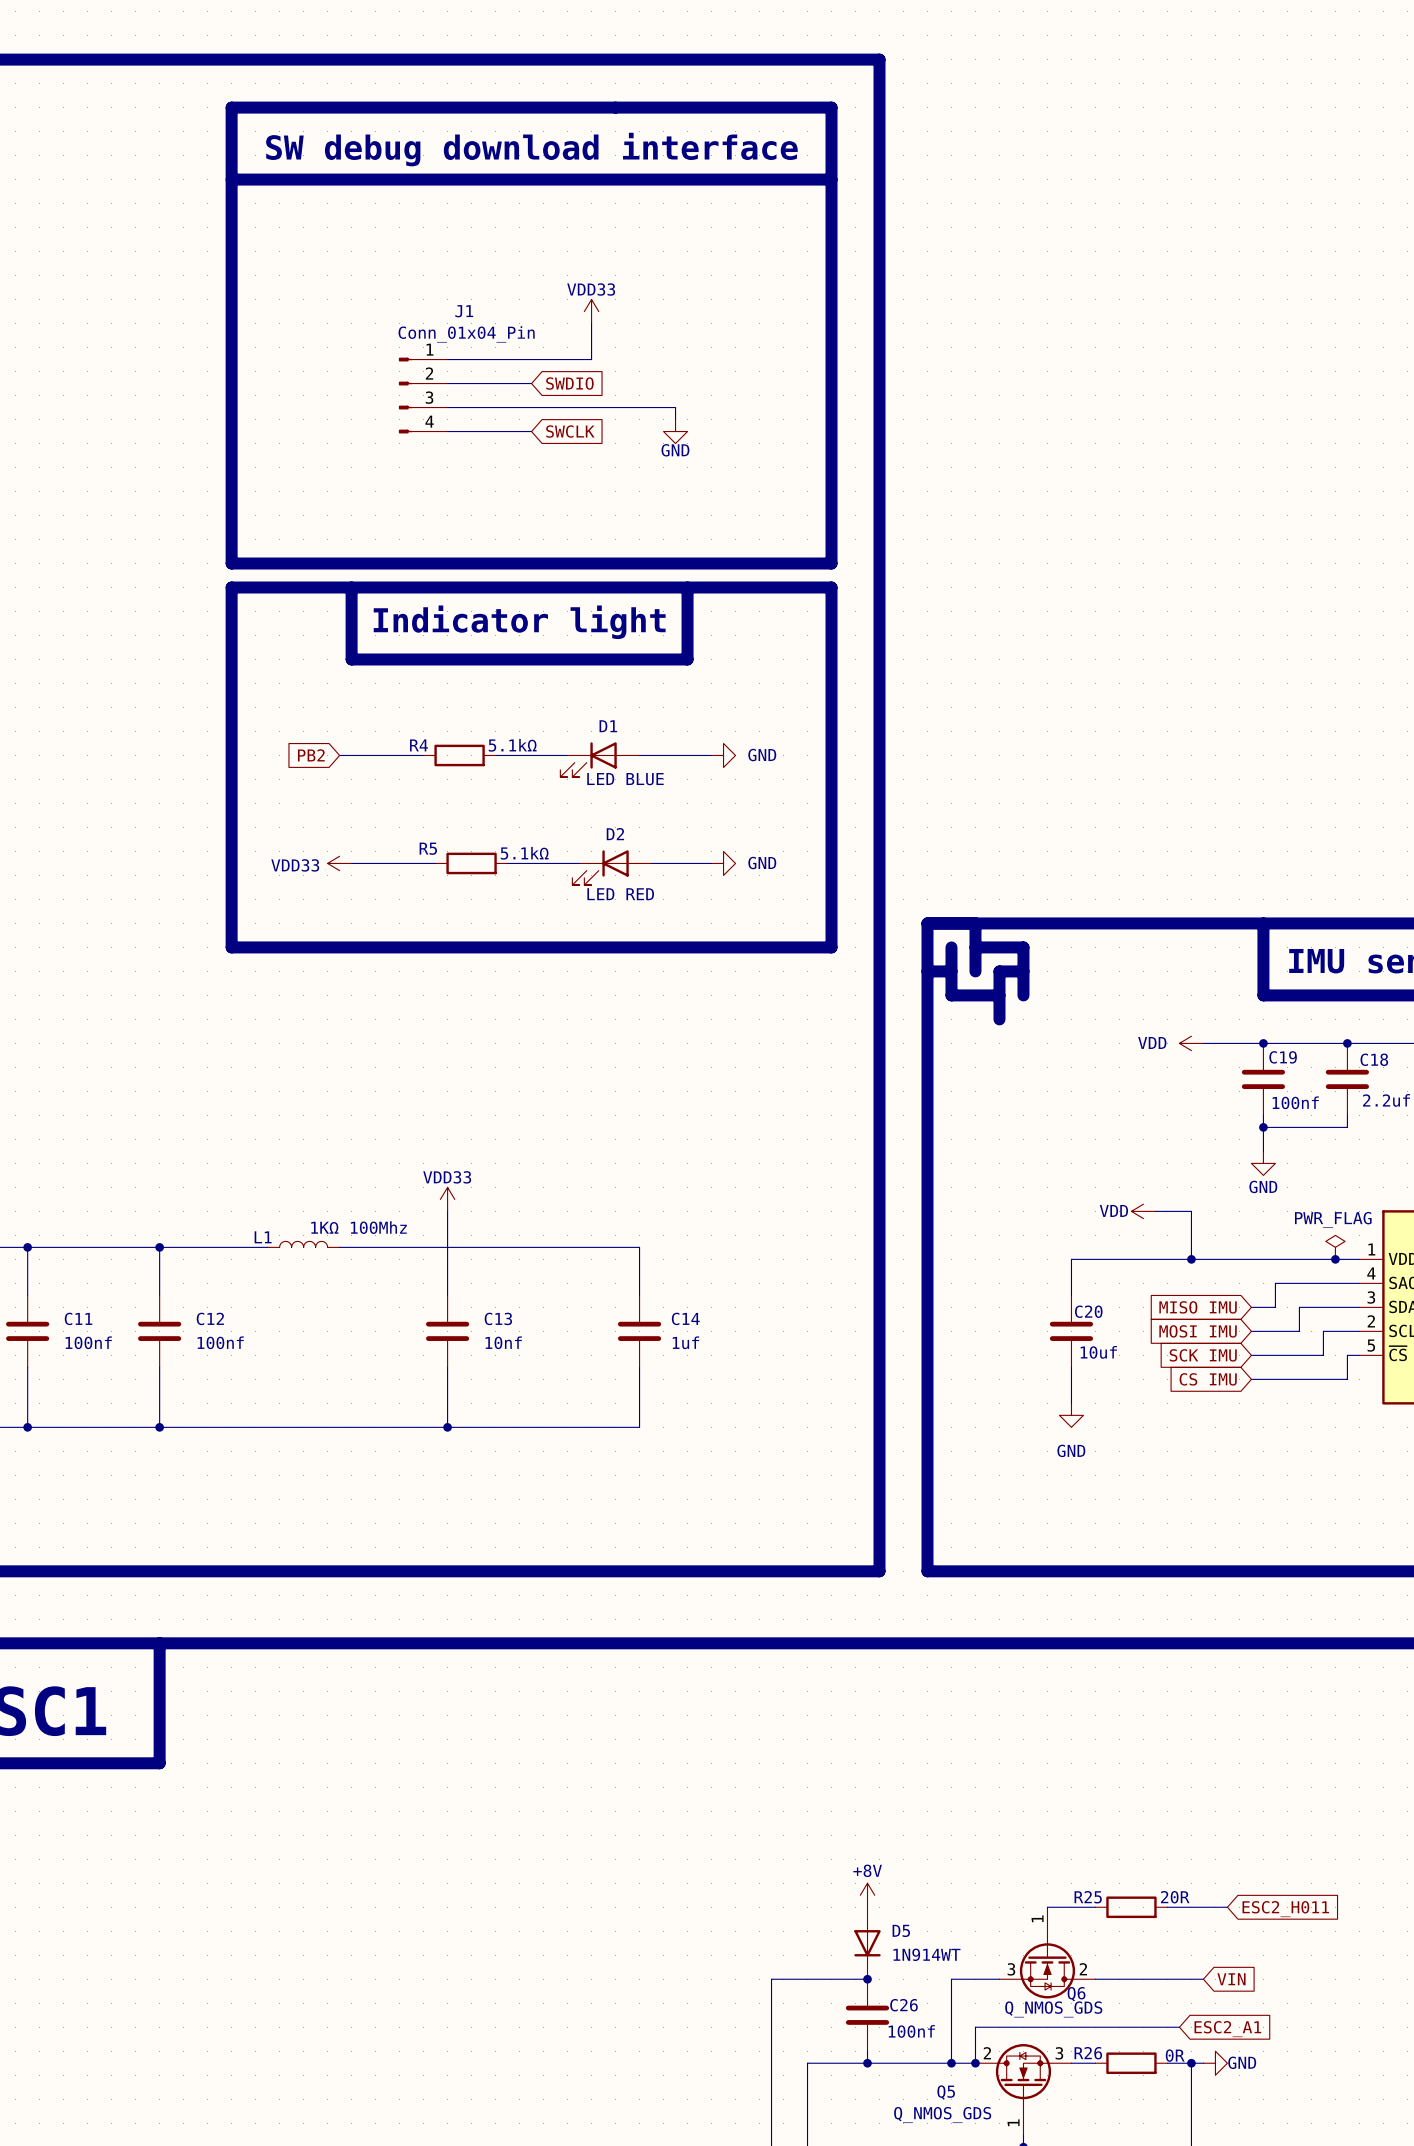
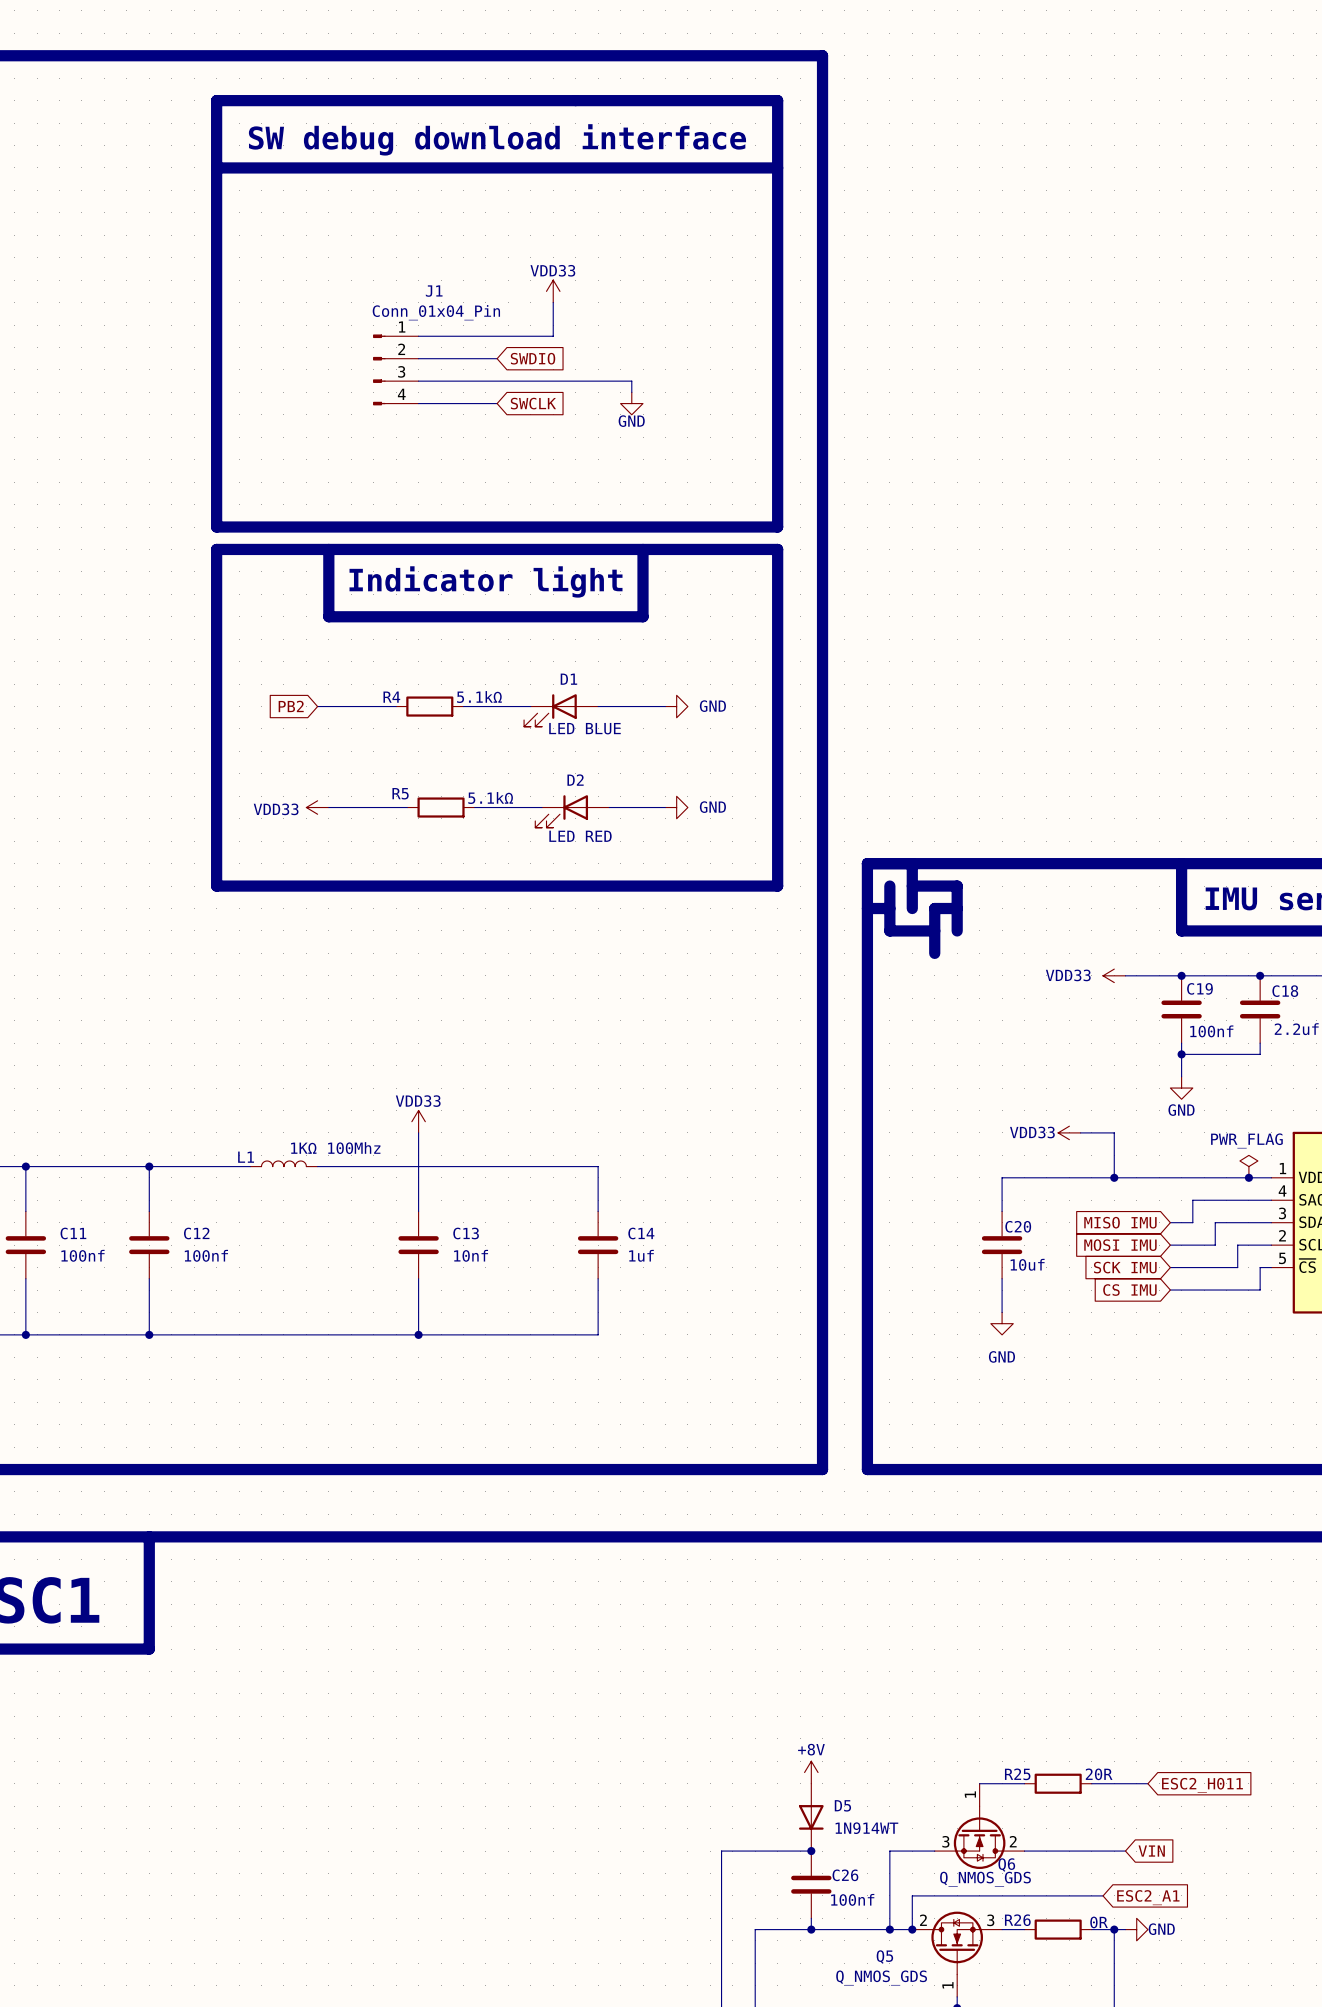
power symbol: VDD (1191, 1043) -> VDD33 (1114, 975)
power symbol: VDD (1143, 1211) -> VDD33 (1069, 1132)

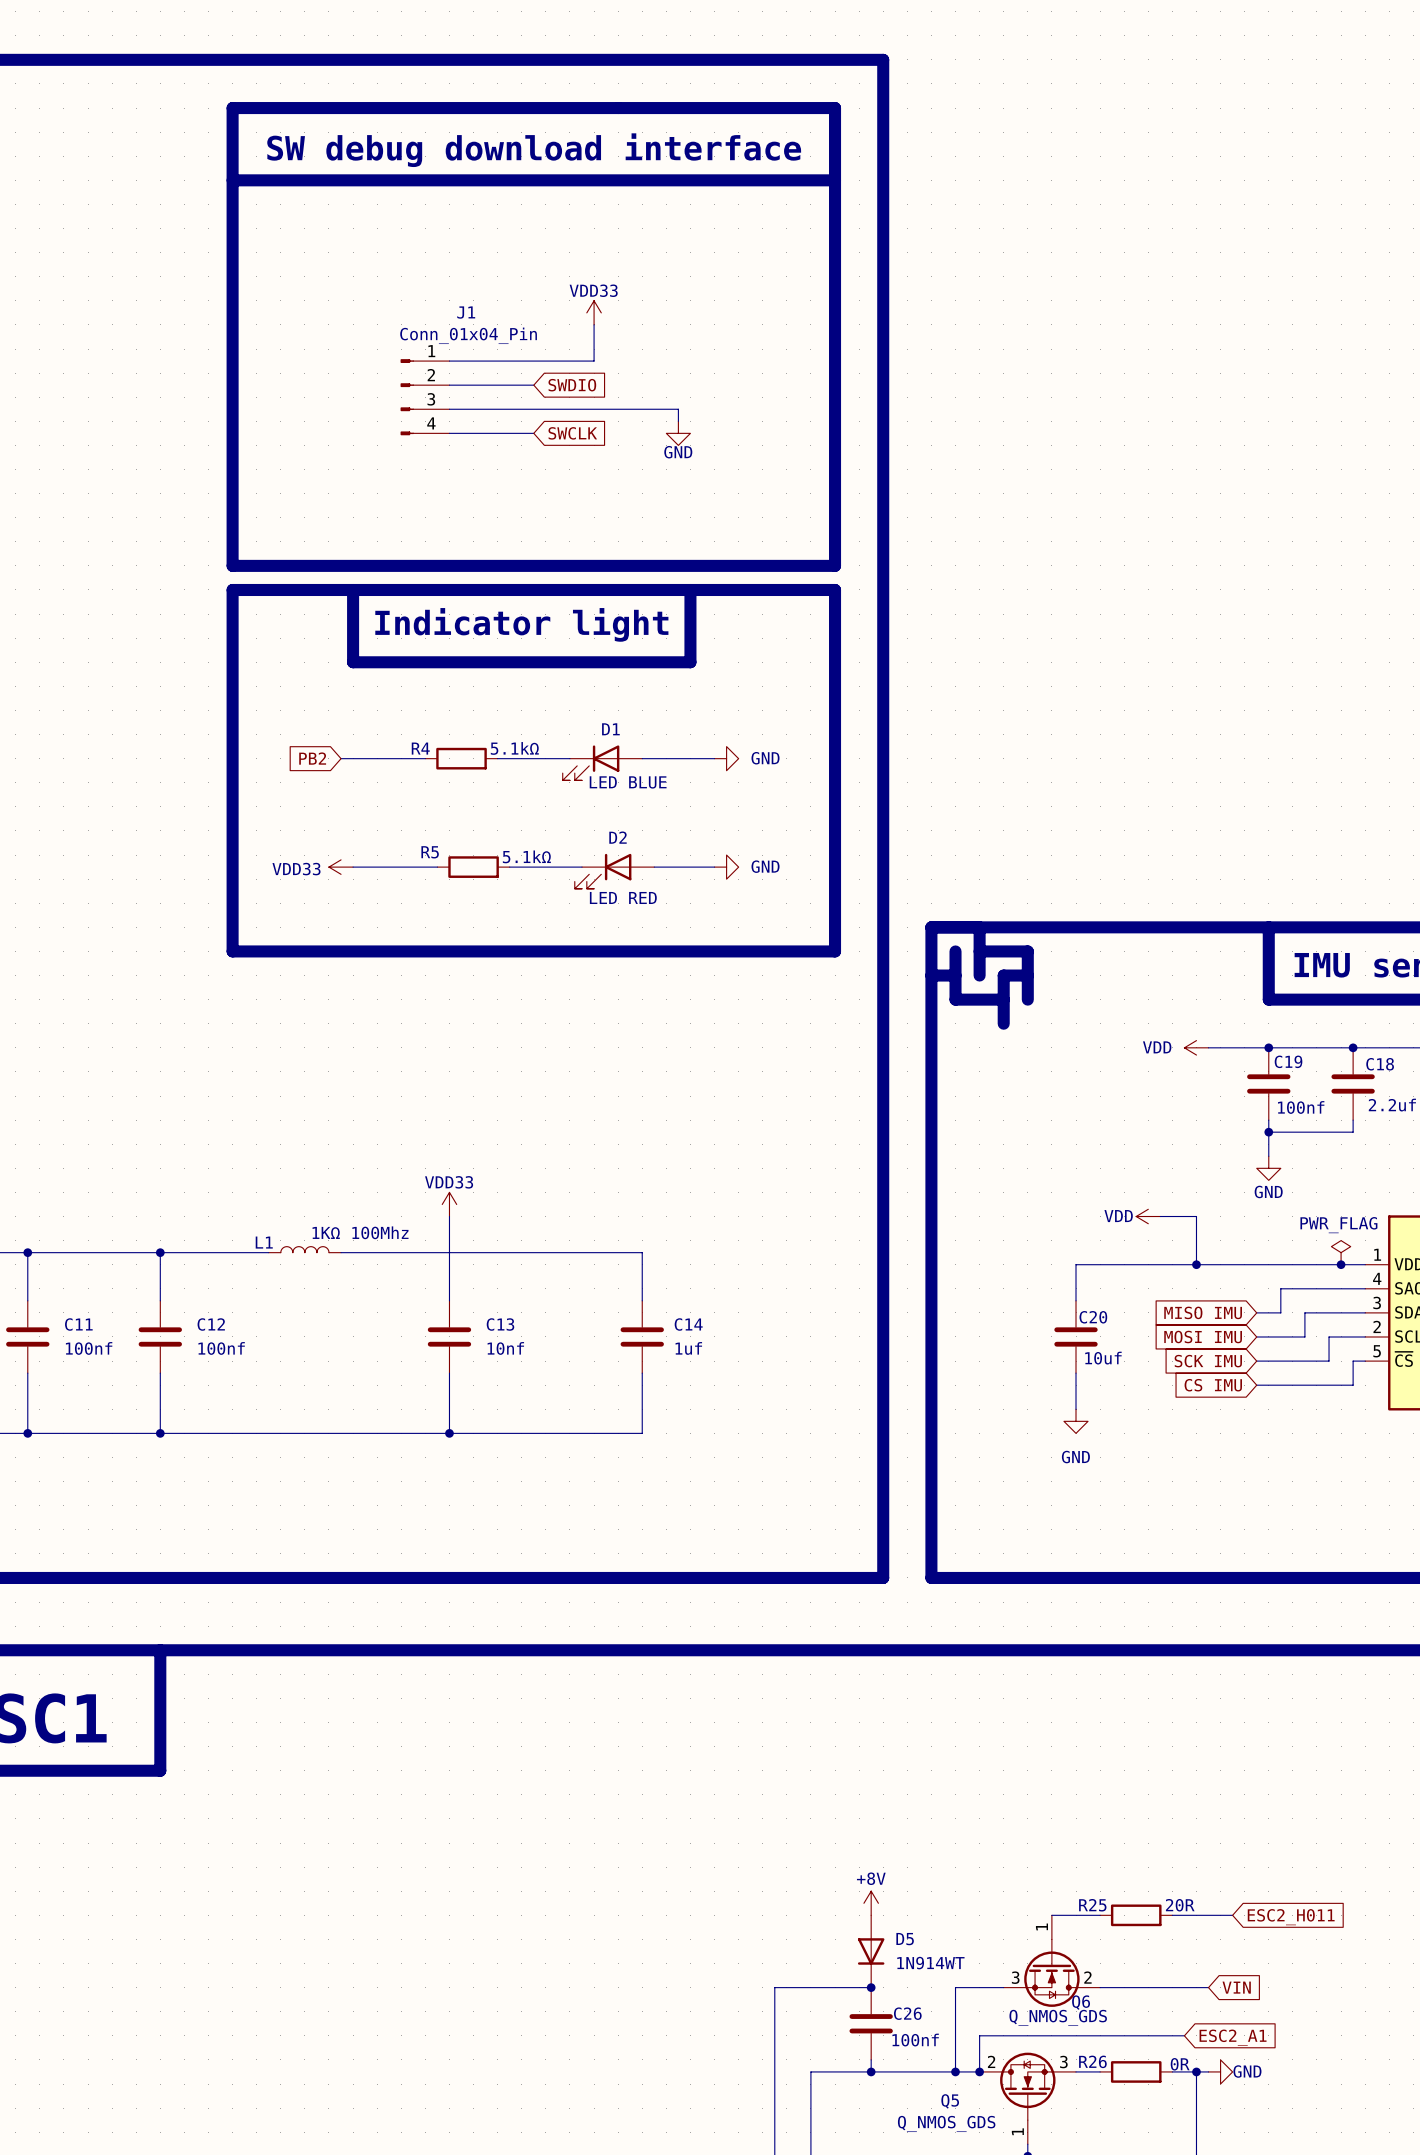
power symbol: VDD33 (1114, 975) -> VDD (1196, 1047)
power symbol: VDD33 (1069, 1132) -> VDD (1148, 1216)

